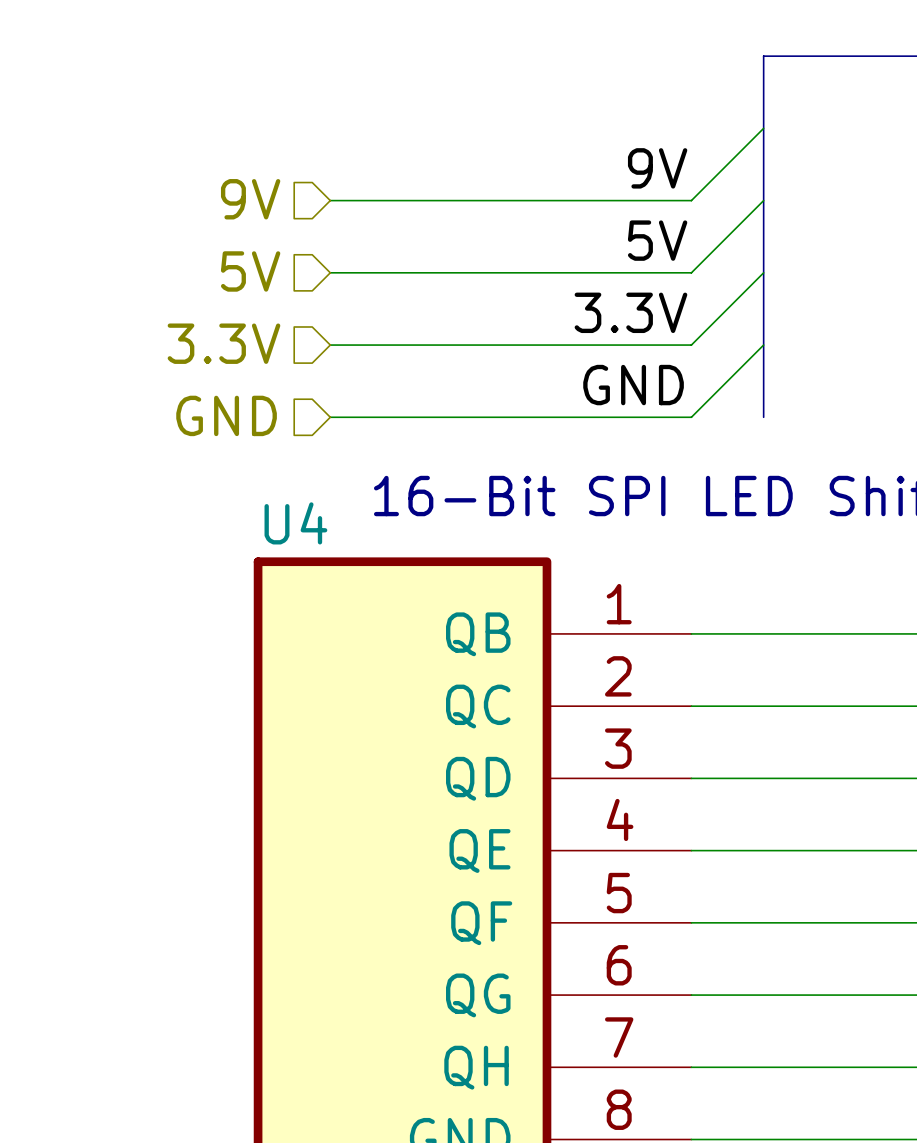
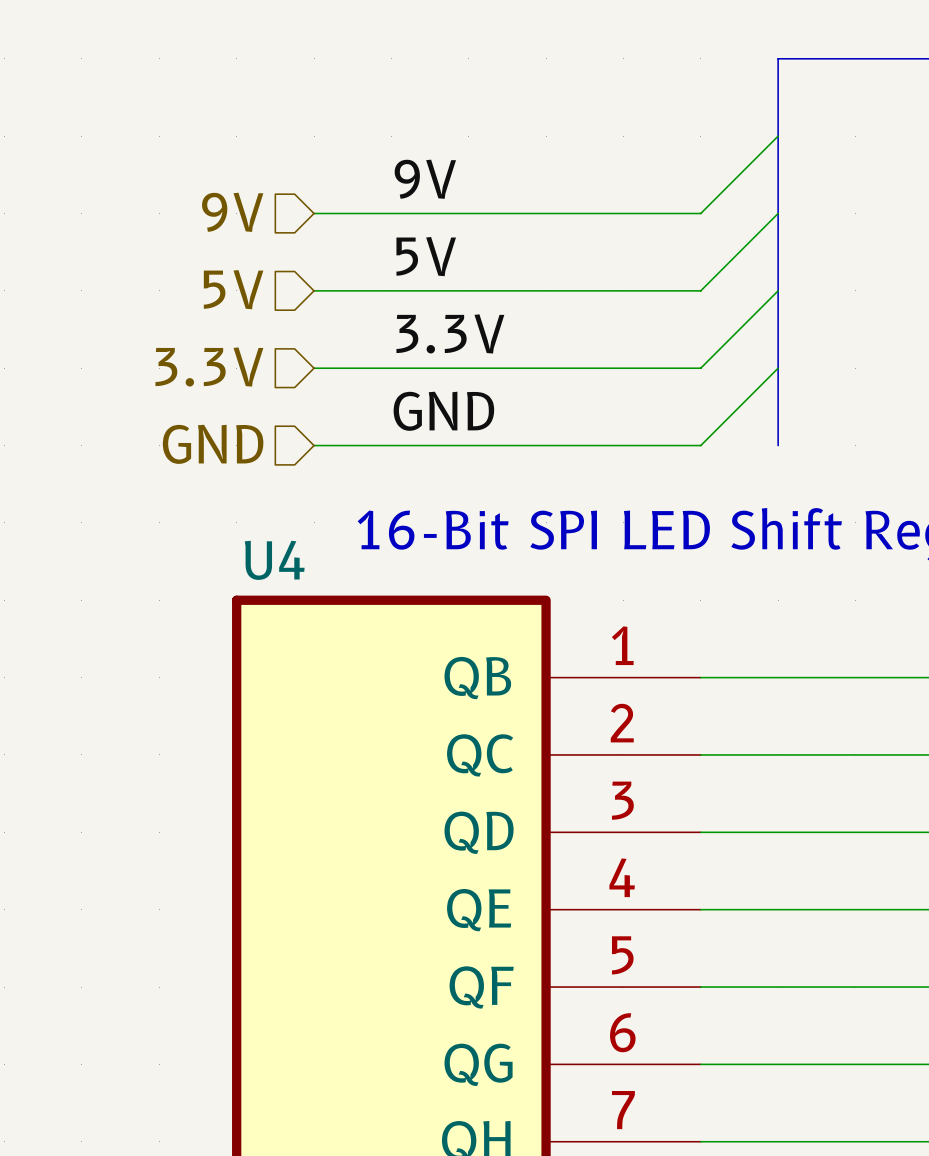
label position: 9V (657, 168) -> 9V (425, 179)
label position: 5V (657, 240) -> 5V (426, 256)
label position: 3.3V (630, 312) -> 3.3V (450, 333)
label position: GND (633, 385) -> GND (443, 411)

